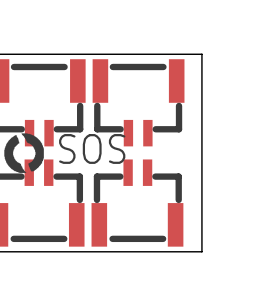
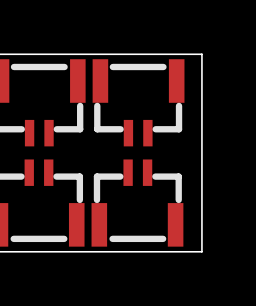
drawing: [4, 133, 44, 173] -> none
text: SOS (92, 148) -> none

